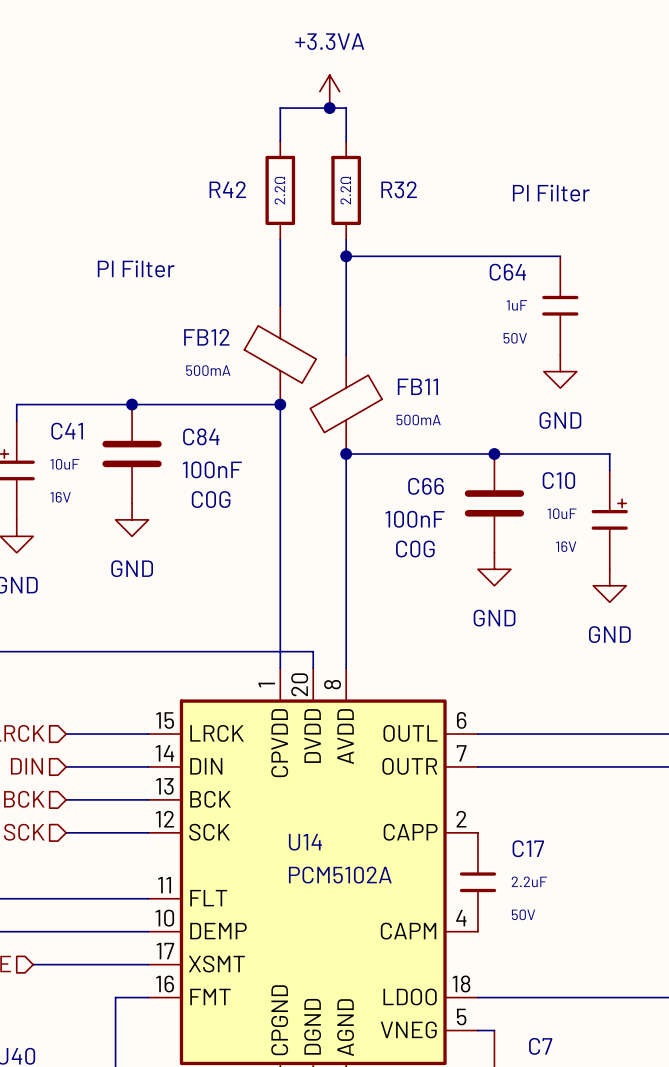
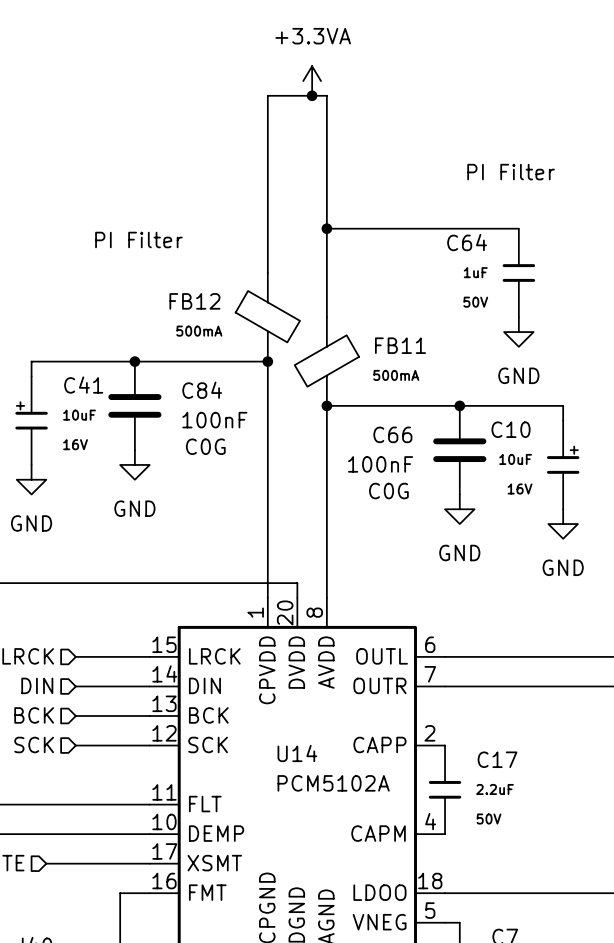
wire: none -> (267, 125) (267, 213)
wire: none -> (326, 125) (326, 213)
R42: 2.2Ω (280, 190) -> none
R32: 2.2Ω (346, 190) -> none

